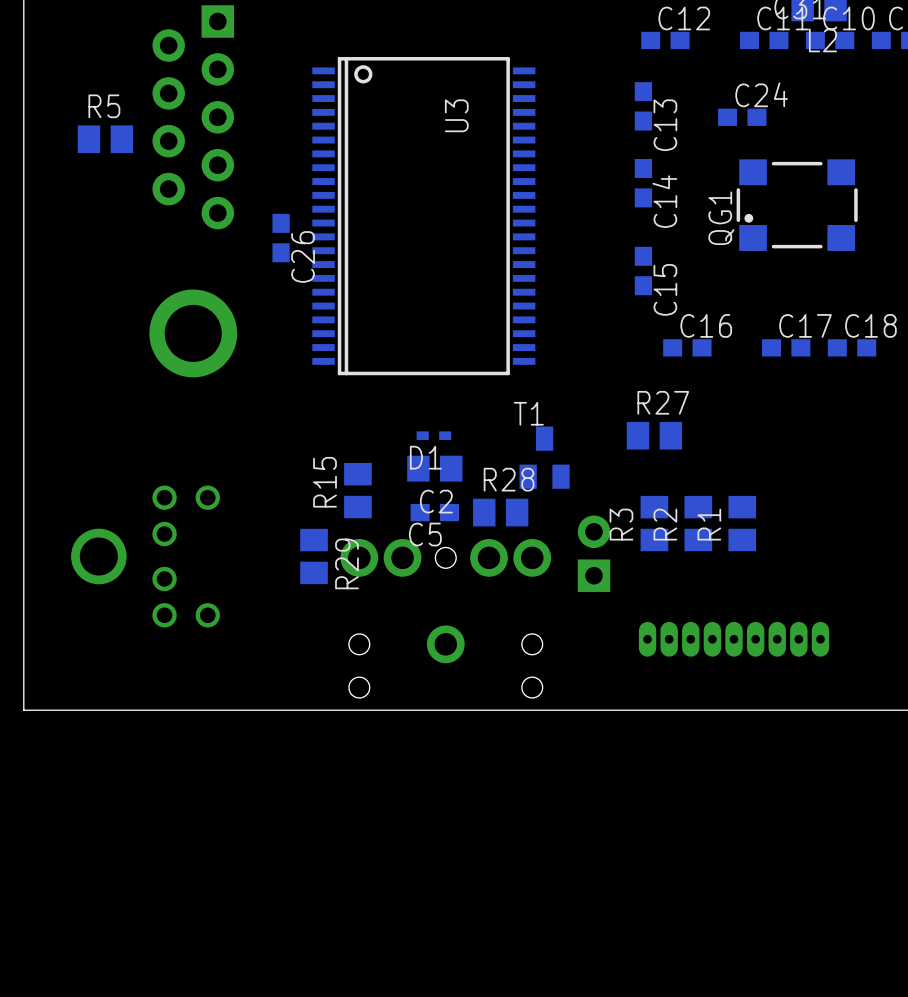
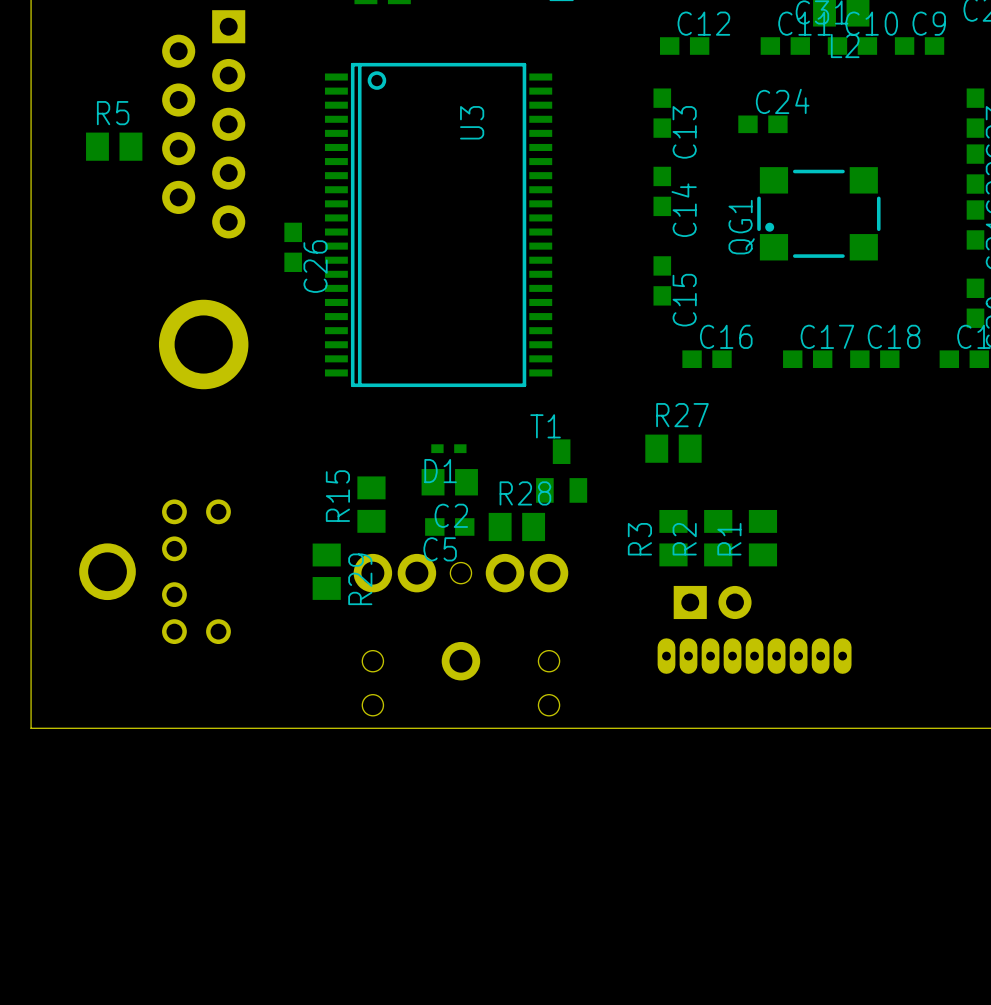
part rotation: 0° (594, 553) -> 90° clockwise (712, 602)
part position: (594, 553) -> (712, 602)

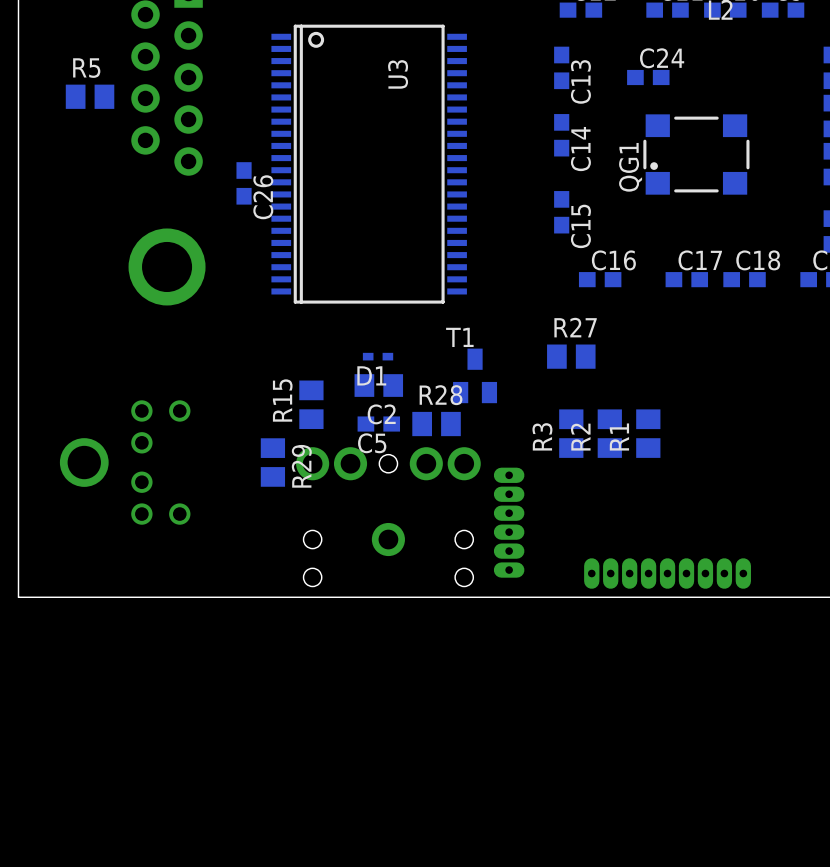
part: (712, 602) -> none
part: none -> (509, 522)
part position: (754, 656) -> (667, 573)

